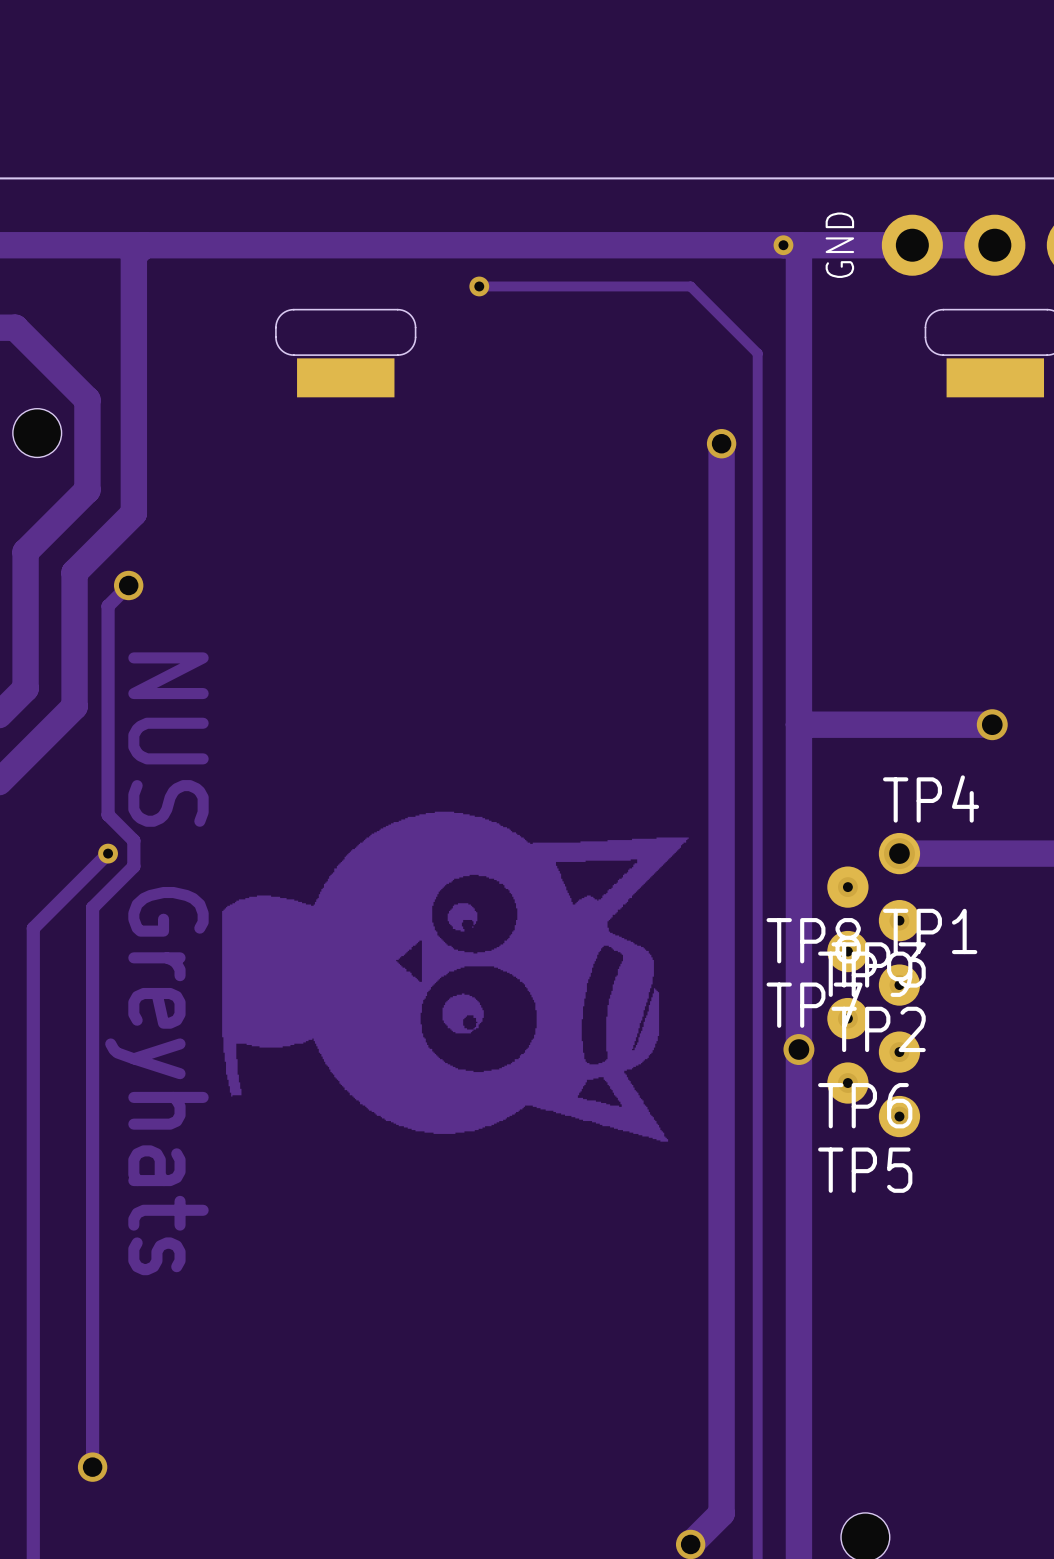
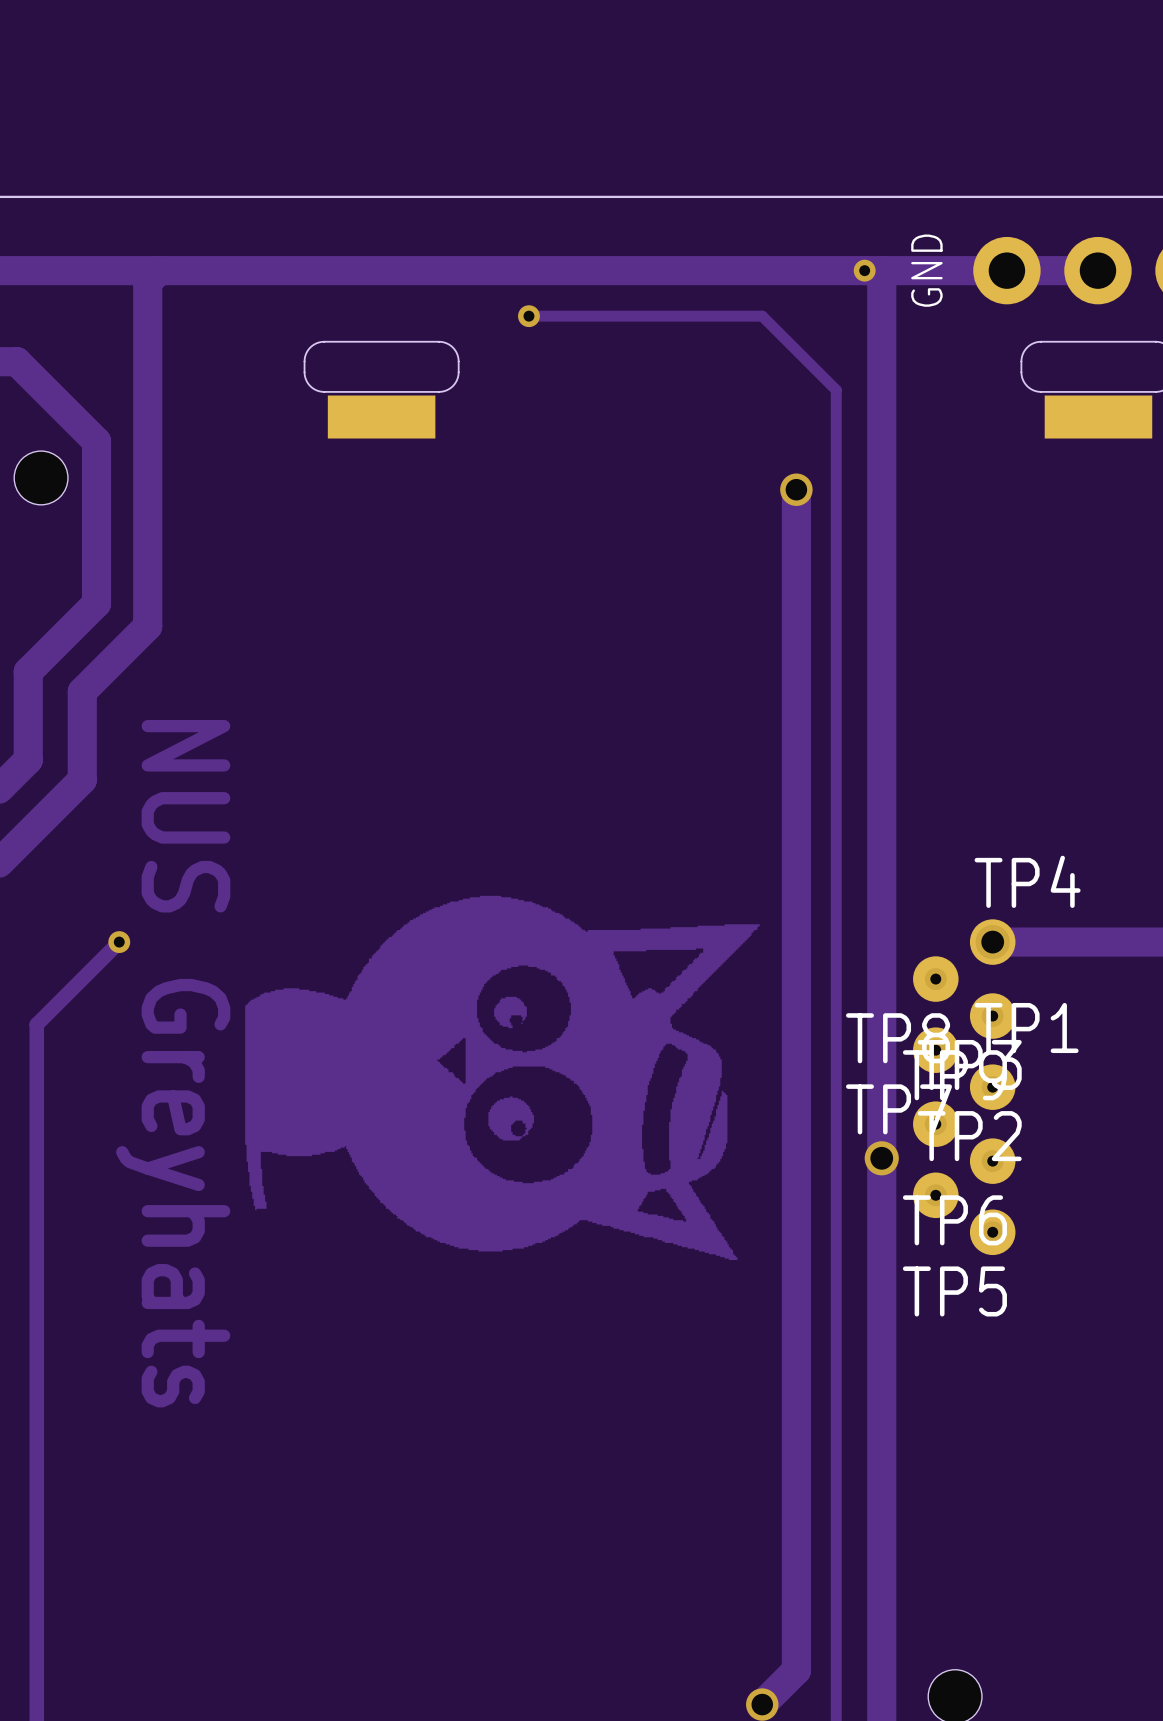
track: (87, 490) (25, 551) (25, 608) -> (96, 540) (96, 603) (28, 671)
track: (133, 513) (74, 572) (74, 626) -> (147, 566) (147, 626) (82, 691)
track: (128, 585) (108, 606) (108, 814) (133, 840) (133, 866) (92, 907) (92, 1467) -> none
via: (128, 585) -> none
track: (992, 724) (798, 724) -> none
via: (992, 724) -> none
via: (92, 1467) -> none

